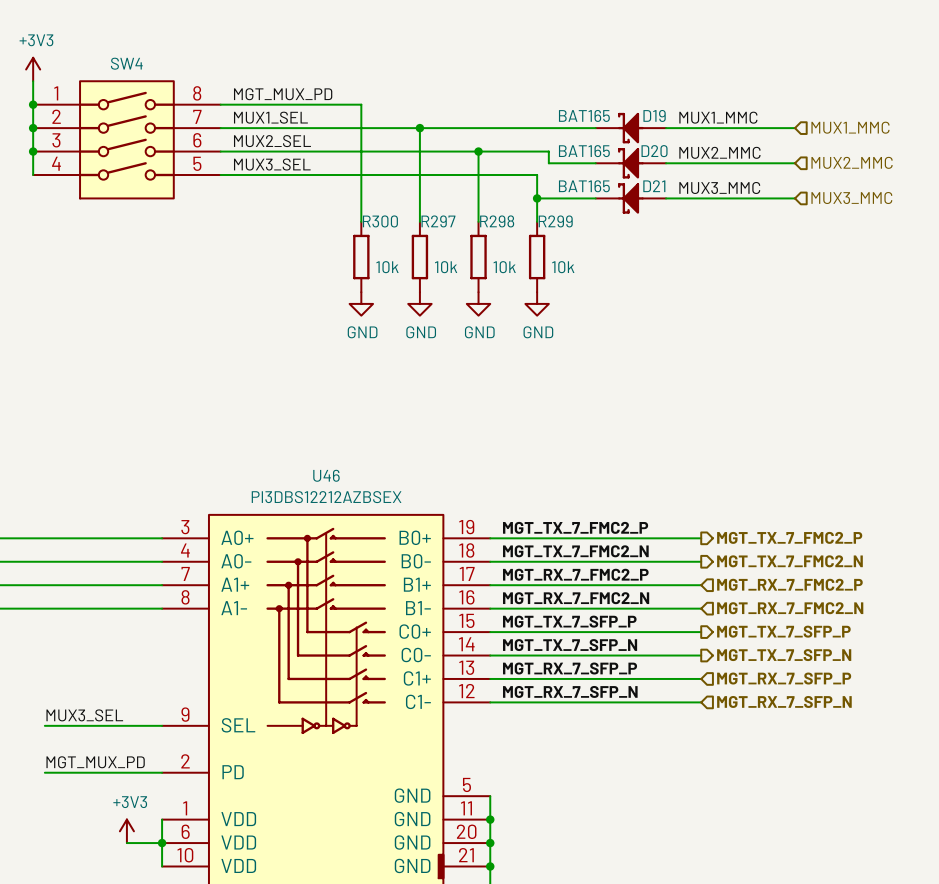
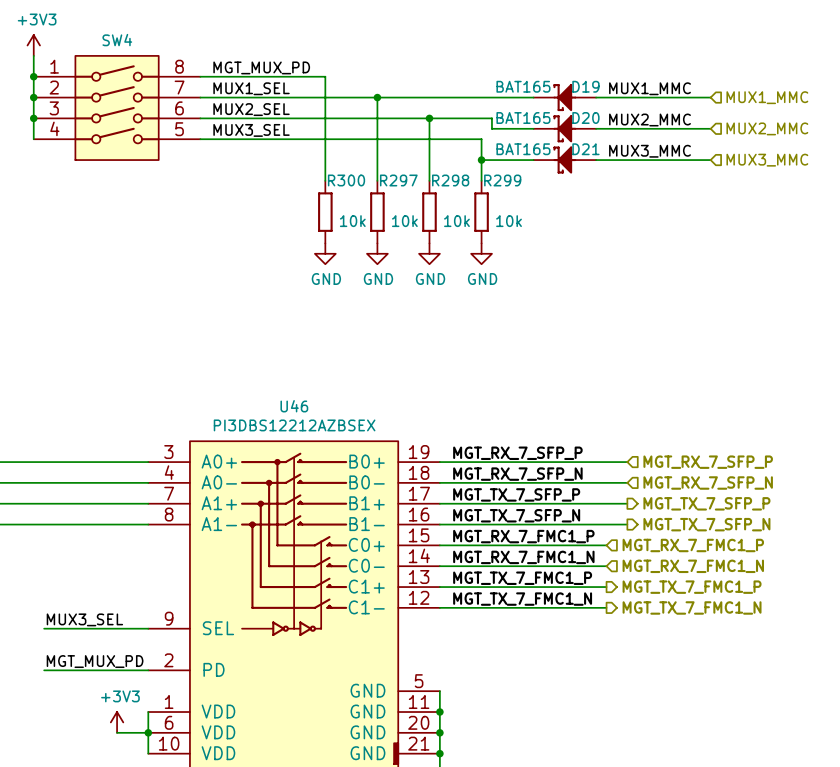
label: MGT_TX_7_FMC2_P (575, 527) -> MGT_RX_7_SFP_P (517, 453)
hierarchical label shape: output (789, 537) -> input (708, 462)
hierarchical label: MGT_TX_7_FMC2_P (789, 537) -> MGT_RX_7_SFP_P (708, 462)
label: MGT_TX_7_FMC2_N (575, 551) -> MGT_RX_7_SFP_N (517, 474)
hierarchical label shape: output (789, 561) -> input (708, 483)
hierarchical label: MGT_TX_7_FMC2_N (789, 561) -> MGT_RX_7_SFP_N (708, 483)
label: MGT_RX_7_FMC2_P (575, 574) -> MGT_TX_7_SFP_P (516, 494)
hierarchical label shape: input (789, 584) -> output (706, 503)
hierarchical label: MGT_RX_7_FMC2_P (789, 584) -> MGT_TX_7_SFP_P (706, 503)
label: MGT_RX_7_FMC2_N (576, 598) -> MGT_TX_7_SFP_N (516, 515)
hierarchical label shape: input (790, 608) -> output (706, 524)
hierarchical label: MGT_RX_7_FMC2_N (790, 608) -> MGT_TX_7_SFP_N (706, 524)
label: MGT_TX_7_SFP_P (569, 621) -> MGT_RX_7_FMC1_P (523, 536)
hierarchical label: none -> MGT_RX_7_FMC1_P (693, 545)
hierarchical label: MGT_TX_7_SFP_P (783, 631) -> none
wire: (677, 632) (701, 632) -> none
label: MGT_TX_7_SFP_N (570, 645) -> MGT_RX_7_FMC1_N (523, 557)
wire: (677, 655) (701, 655) -> none
hierarchical label: none -> MGT_RX_7_FMC1_N (693, 566)
hierarchical label: MGT_TX_7_SFP_N (784, 655) -> none
label: MGT_RX_7_SFP_P (570, 668) -> MGT_TX_7_FMC1_P (522, 578)
wire: (677, 678) (701, 678) -> none
hierarchical label: none -> MGT_TX_7_FMC1_P (692, 587)
hierarchical label: MGT_RX_7_SFP_P (784, 678) -> none
label: MGT_RX_7_SFP_N (570, 691) -> MGT_TX_7_FMC1_N (522, 599)
hierarchical label: none -> MGT_TX_7_FMC1_N (692, 607)
hierarchical label: MGT_RX_7_SFP_N (784, 701) -> none
wire: (677, 702) (701, 702) -> none

